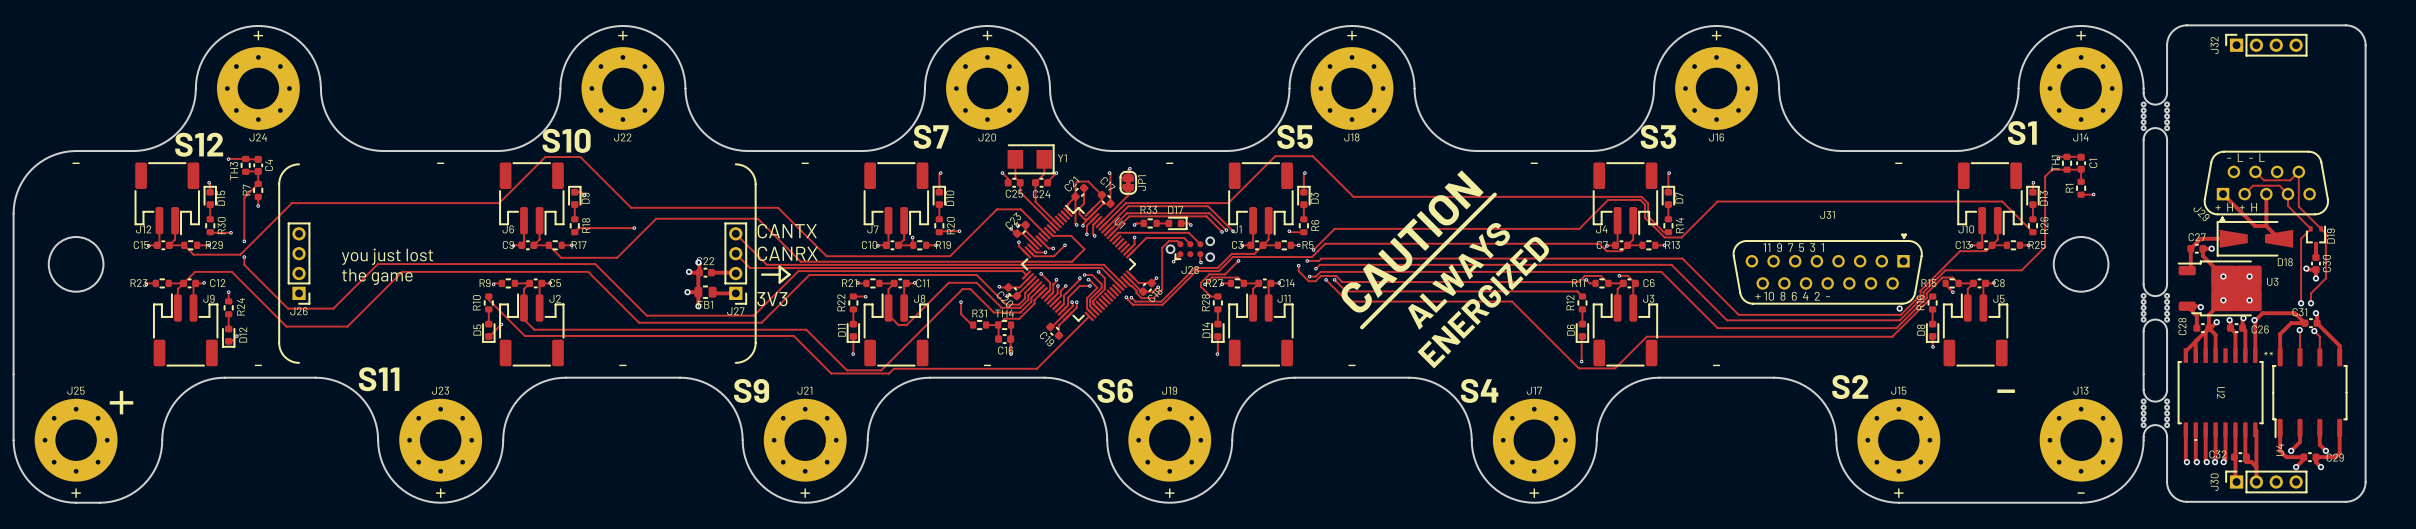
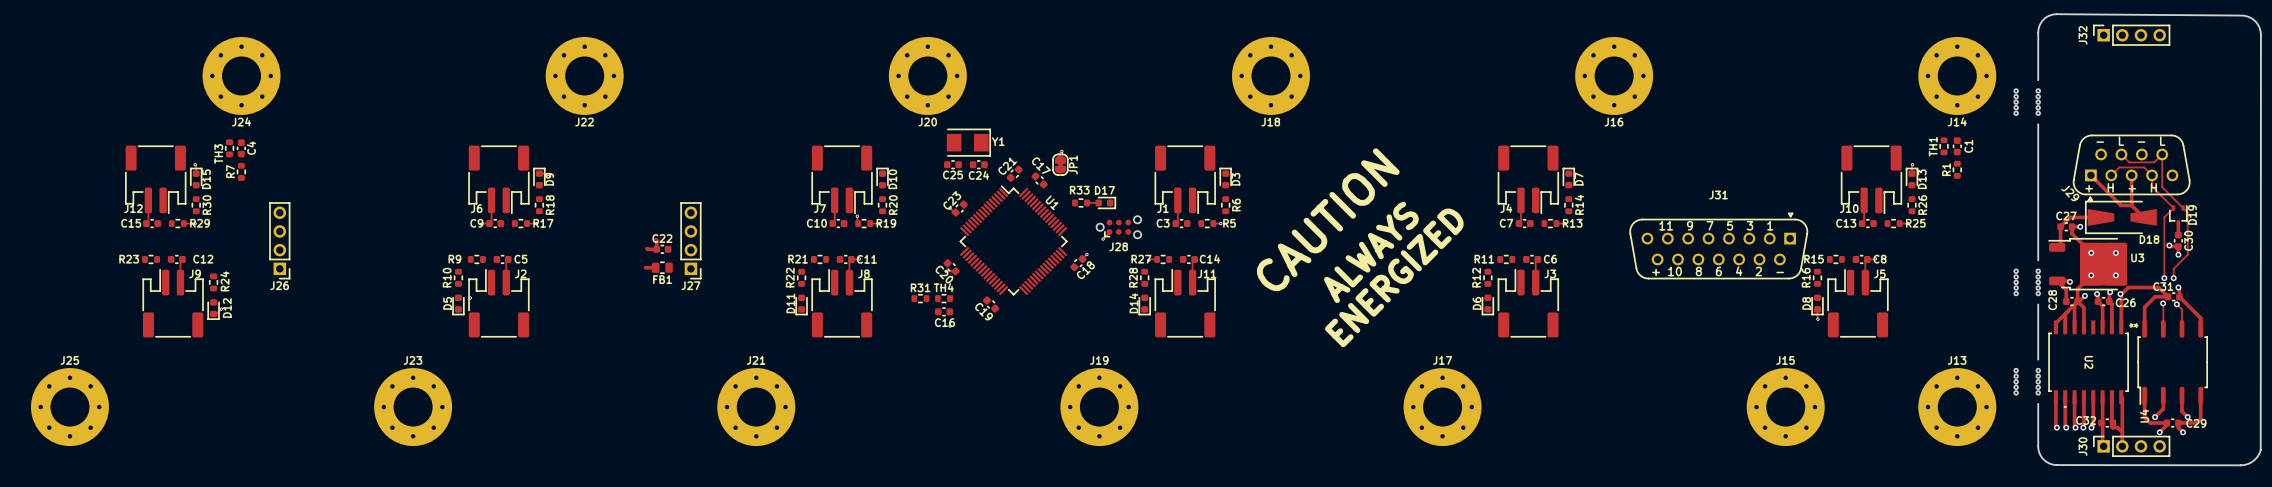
board edge: none -> (2240, 15) (2054, 14) (2042, 21) (2038, 35)
board edge: none -> (2241, 15) (2255, 21) (2260, 34) (2260, 450) (2253, 461) (2240, 465)
text: + (258, 35) -> none
text: + (622, 35) -> none
text: + (987, 35) -> none
text: + (1352, 35) -> none
text: + (1716, 35) -> none
text: + (2081, 35) -> none
board edge: (2167, 45) (2168, 37) (2172, 31) (2179, 26) (2186, 25) (2347, 25) (2359, 31) (2365, 45) (2364, 489) (2357, 497) (2348, 501) (2186, 501) -> (2240, 465) (2056, 465)
board edge: (2167, 92) (2165, 98) (2159, 103) (2153, 104) (2148, 102) (2144, 95) (2139, 65) (2130, 50) (2123, 42) (2108, 32) (2098, 28) (2081, 25) (2069, 27) (2048, 35) (2031, 50) (2020, 71) (2017, 99) (2012, 114) (2000, 132) (1982, 145) (1956, 151) (1830, 150) (1805, 139) (1790, 124) (1781, 104) (1774, 65) (1762, 46) (1749, 35) (1739, 30) (1722, 26) (1710, 26) (1688, 32) (1674, 42) (1666, 50) (1656, 71) (1653, 99) (1648, 114) (1639, 128) (1622, 142) (1596, 150) (1471, 150) (1445, 142) (1425, 124) (1416, 104) (1410, 65) (1401, 50) (1394, 42) (1384, 35) (1369, 28) (1346, 26) (1324, 32) (1309, 42) (1302, 50) (1291, 71) (1288, 99) (1283, 114) (1274, 128) (1258, 142) (1232, 150) (1107, 150) (1081, 142) (1061, 124) (1052, 104) (1045, 65) (1033, 46) (1015, 32) (998, 27) (987, 25) (975, 27) (959, 32) (945, 42) (937, 50) (927, 71) (923, 99) (919, 114) (910, 128) (893, 142) (867, 150) (747, 151) (726, 147) (703, 132) (689, 109) (683, 71) (672, 50) (665, 42) (650, 32) (640, 28) (622, 25) (605, 28) (595, 32) (580, 42) (573, 50) (562, 71) (559, 99) (554, 114) (545, 128) (529, 142) (503, 150) (383, 151) (367, 148) (352, 142) (332, 124) (323, 104) (316, 65) (308, 50) (300, 42) (286, 32) (275, 28) (258, 25) (246, 27) (225, 35) (208, 50) (198, 71) (194, 99) (190, 114) (181, 128) (169, 139) (154, 147) (138, 150) (76, 151) (59, 153) (35, 165) (21, 182) (15, 197) (13, 213) (13, 440) (15, 456) (21, 471) (31, 484) (44, 494) (70, 502) (110, 501) (135, 491) (150, 476) (160, 456) (163, 429) (168, 413) (180, 396) (193, 386) (219, 377) (326, 378) (351, 388) (366, 404) (376, 424) (382, 462) (394, 482) (407, 493) (418, 498) (429, 501) (446, 502) (468, 496) (482, 486) (490, 477) (500, 457) (504, 429) (509, 413) (521, 396) (534, 386) (560, 377) (685, 377) (711, 386) (731, 404) (740, 424) (746, 462) (752, 473) (763, 486) (777, 496) (788, 500) (810, 502) (833, 496) (847, 486) (855, 477) (865, 457) (868, 429) (873, 413) (886, 396) (898, 386) (924, 377) (1050, 377) (1075, 386) (1095, 404) (1105, 424) (1111, 462) (1123, 482) (1141, 496) (1152, 500) (1169, 502) (1181, 501) (1197, 496) (1207, 490) (1219, 477) (1229, 457) (1233, 429) (1238, 413) (1250, 396) (1263, 386) (1289, 377) (1409, 377) (1435, 383) (1453, 396) (1467, 418) (1474, 457) (1484, 477) (1492, 486) (1506, 496) (1517, 500) (1534, 502) (1551, 500) (1562, 496) (1576, 486) (1584, 477) (1594, 457) (1597, 429) (1602, 413) (1615, 396) (1628, 386) (1653, 377) (1773, 377) (1800, 383) (1821, 400) (1832, 418) (1838, 456) (1844, 471) (1858, 488) (1877, 498) (1898, 502) (2081, 502) (2107, 496) (2129, 480) (2139, 461) (2144, 433) (2148, 427) (2153, 425) (2159, 425) (2165, 430) (2167, 436) -> none
text: S1 (2022, 133) -> none
text: S7 (931, 136) -> none
text: S5 (1295, 136) -> none
text: S3 (1658, 136) -> none
board edge: (2167, 139) (2163, 131) (2155, 128) (2147, 131) (2143, 139) (2143, 285) (2148, 293) (2156, 296) (2163, 292) (2167, 284) -> none
text: S10 (566, 140) -> none
text: S12 (199, 144) -> none
track: (2080, 156) (2060, 156) (2058, 158) -> none
track: (245, 158) (228, 159) -> none
via: (2058, 158) -> none
via: (228, 159) -> none
track: (246, 159) (258, 159) -> none
track: (1015, 159) (1015, 177) (1020, 182) (1020, 192) (1054, 226) -> none
track: (1044, 159) (1044, 173) (1035, 182) (1035, 201) (1056, 223) -> none
text: - (76, 163) -> none
text: - (440, 163) -> none
text: - (805, 163) -> none
text: - (1169, 163) -> none
text: - (1534, 163) -> none
text: - (1898, 163) -> none
line: (299, 164) (286, 168) (281, 174) (279, 181) (279, 343) (284, 357) (299, 362) -> none
line: (735, 164) (743, 165) (749, 170) (755, 181) (755, 343) (749, 357) (735, 362) -> none
track: (2080, 169) (2051, 169) (2045, 176) (2045, 246) (2021, 270) (1945, 270) (1923, 292) (1923, 296) (1899, 320) (1727, 320) (1671, 264) (1319, 264) (1315, 268) -> none
track: (2081, 169) (2081, 181) -> none
track: (246, 171) (258, 171) (258, 183) (244, 197) (244, 241) -> none
track: (940, 173) (939, 192) -> none
via: (940, 173) -> none
track: (1002, 173) (1008, 178) (1008, 182) -> none
via: (1002, 173) -> none
track: (1056, 173) (1047, 181) -> none
via: (1056, 173) -> none
track: (1109, 173) (1110, 203) (1103, 203) (1082, 225) -> none
via: (1109, 173) -> none
track: (1304, 173) (1303, 192) -> none
via: (1304, 173) -> none
track: (1669, 173) (1668, 192) -> none
via: (1669, 173) -> none
track: (1128, 187) (1128, 195) (1100, 223) -> none
track: (1084, 188) (1084, 203) (1079, 208) (1079, 214) (1084, 219) (1087, 219) -> none
line: (1494, 194) (1362, 327) -> none
track: (2093, 194) (2081, 194) -> none
via: (2093, 194) -> none
track: (258, 196) (258, 206) -> none
track: (1075, 196) (1067, 204) (1067, 212) -> none
track: (210, 204) (210, 219) -> none
track: (574, 204) (574, 219) -> none
track: (939, 204) (939, 219) -> none
track: (1303, 204) (1303, 219) -> none
track: (1668, 204) (1668, 219) -> none
track: (2032, 204) (2032, 219) -> none
via: (258, 206) -> none
track: (1089, 212) (1101, 199) (1101, 195) (1088, 181) (1077, 181) (1075, 184) (1076, 225) -> none
track: (1094, 217) (1086, 225) (1086, 234) -> none
track: (175, 220) (175, 239) (169, 245) (184, 245) (193, 254) (240, 254) (292, 203) (499, 203) (545, 156) (580, 156) (631, 207) (778, 207) (826, 256) (950, 256) (997, 209) (1020, 209) (1045, 234) -> none
track: (539, 220) (539, 239) (533, 245) (548, 245) (561, 257) (617, 257) (656, 218) (757, 218) (800, 261) (1072, 261) (1084, 249) (1071, 235) (1052, 235) (1048, 231) -> none
track: (904, 220) (904, 239) (898, 245) (913, 245) -> none
track: (1097, 220) (1093, 224) (1094, 235) -> none
track: (1268, 220) (1268, 239) (1254, 253) (1231, 253) (1217, 267) (1195, 267) (1161, 301) (1135, 301) (1131, 297) -> none
track: (1633, 220) (1633, 239) (1621, 251) (1606, 251) (1599, 243) (1325, 243) (1312, 257) (1233, 257) (1218, 271) (1196, 271) (1162, 304) (1132, 304) (1126, 297) -> none
track: (1997, 220) (1997, 239) (1986, 251) (1960, 251) (1920, 290) (1920, 295) (1900, 314) (1738, 314) (1682, 258) (1321, 258) (1319, 260) (1307, 260) -> none
track: (1143, 223) (1134, 225) -> none
track: (1181, 223) (1190, 225) -> none
track: (1017, 225) (1025, 225) (1025, 230) (1037, 242) -> none
via: (1017, 225) -> none
via: (1076, 225) -> none
via: (1082, 225) -> none
via: (1134, 225) -> none
via: (1190, 225) -> none
track: (1103, 226) (1126, 203) (1228, 203) (1275, 156) (1312, 156) (1353, 196) (1641, 196) (1648, 203) (1648, 216) (1663, 232) (1668, 232) -> none
track: (634, 228) (578, 228) (574, 232) -> none
via: (634, 228) -> none
track: (1105, 228) (1128, 206) (1208, 206) (1233, 231) -> none
track: (1226, 230) (1209, 213) (1126, 213) (1108, 231) -> none
via: (1226, 230) -> none
text: CANTX (787, 231) -> none
track: (940, 231) (959, 231) -> none
via: (959, 231) -> none
track: (1222, 231) (1206, 216) (1129, 216) (1111, 234) -> none
via: (1222, 231) -> none
via: (1233, 231) -> none
track: (1289, 231) (1303, 232) -> none
via: (1289, 231) -> none
track: (210, 232) (231, 232) -> none
via: (231, 232) -> none
track: (2032, 232) (2002, 201) (1717, 201) (1681, 237) (1664, 237) (1644, 217) (1644, 204) (1640, 199) (1608, 199) (1579, 228) (1334, 228) (1313, 249) -> none
track: (735, 233) (766, 264) (1103, 264) (1122, 283) -> none
track: (1017, 233) (1022, 233) (1034, 245) -> none
via: (1086, 234) -> none
via: (1094, 235) -> none
round board edge: [47, 236, 105, 293] -> none
round board edge: [2052, 236, 2110, 293] -> none
track: (1114, 237) (1118, 232) (1188, 232) (1200, 244) -> none
track: (1134, 237) (1134, 244) (1127, 250) -> none
via: (1134, 237) -> none
track: (1040, 239) (1048, 248) (1053, 248) -> none
via: (244, 241) -> none
track: (1018, 242) (1018, 246) (1026, 253) -> none
via: (1018, 242) -> none
track: (1180, 244) (1177, 241) (1168, 241) (1162, 247) (1162, 289) (1153, 298) (1141, 298) (1125, 280) -> none
track: (1190, 244) (1184, 238) (1146, 238) (1130, 253) -> none
via: (148, 245) -> none
track: (157, 245) (148, 245) -> none
via: (877, 245) -> none
track: (886, 245) (877, 245) -> none
track: (1065, 245) (1054, 256) (1034, 256) (1029, 250) -> none
via: (1065, 245) -> none
via: (1242, 245) -> none
track: (1250, 245) (1242, 245) -> none
track: (1263, 245) (1277, 245) -> none
via: (1606, 245) -> none
track: (1615, 245) (1606, 245) -> none
track: (1627, 245) (1642, 245) -> none
via: (1971, 245) -> none
track: (1979, 245) (1971, 245) -> none
track: (1992, 245) (2006, 245) -> none
track: (1032, 248) (1036, 252) (1045, 252) -> none
via: (1053, 248) -> none
via: (1313, 249) -> none
via: (1045, 252) -> none
track: (735, 253) (750, 267) (1101, 267) (1119, 286) -> none
text: CANRX (787, 253) -> none
track: (1200, 254) (1201, 262) -> none
text: you just lost (387, 256) -> none
track: (244, 257) (244, 264) (288, 308) (333, 308) (377, 264) (595, 264) (646, 315) (753, 315) (798, 271) (1022, 271) (1026, 274) -> none
via: (244, 257) -> none
track: (1238, 260) (1225, 274) (1209, 274) (1201, 282) (1201, 286) (1210, 296) (1217, 296) -> none
via: (1238, 260) -> none
via: (1307, 260) -> none
via: (698, 262) -> none
via: (1201, 262) -> none
track: (1298, 265) (1298, 271) (1308, 281) (1315, 281) (1320, 275) (1336, 275) (1342, 282) (1578, 282) (1584, 275) (1601, 275) (1608, 283) (1623, 283) (1617, 289) (1617, 308) -> none
via: (1298, 265) -> none
line: (779, 266) (779, 282) (789, 274) (779, 266) -> none
via: (1315, 268) -> none
via: (689, 271) -> none
track: (1098, 271) (1104, 278) (1104, 289) (1093, 300) (1093, 303) (1097, 308) -> none
via: (1098, 271) -> none
track: (711, 272) (734, 272) -> none
track: (698, 273) (698, 306) -> none
track: (1041, 273) (1050, 282) (1050, 290) (1045, 294) -> none
via: (1041, 273) -> none
line: (762, 274) (779, 274) -> none
track: (1130, 274) (1138, 283) (1151, 283) -> none
track: (1084, 275) (1092, 275) (1101, 284) (1101, 287) (1090, 299) (1090, 306) (1094, 310) -> none
via: (1084, 275) -> none
track: (1619, 275) (1627, 275) (1635, 283) -> none
via: (1619, 275) -> none
text: the game (377, 276) -> none
track: (1309, 276) (1315, 276) (1320, 271) (1661, 271) (1717, 328) (1896, 328) (1926, 297) (1926, 293) (1942, 277) (1952, 277) (1958, 283) (1973, 283) (1967, 289) (1967, 308) -> none
via: (1309, 276) -> none
track: (1029, 277) (1019, 287) (999, 286) -> none
track: (1127, 277) (1141, 291) -> none
track: (1079, 278) (1063, 295) (1063, 303) (1059, 308) -> none
via: (1079, 278) -> none
track: (1056, 279) (1053, 284) (1053, 292) (1048, 297) -> none
via: (1056, 279) -> none
track: (1088, 279) (1097, 287) (1087, 298) (1087, 308) (1092, 313) -> none
via: (1088, 279) -> none
track: (1326, 279) (1347, 301) (1512, 301) (1578, 368) (1615, 368) (1646, 336) (1892, 336) (1932, 296) -> none
via: (1326, 279) -> none
track: (1334, 279) (1346, 291) (1577, 291) (1582, 296) -> none
via: (1334, 279) -> none
track: (1586, 279) (1589, 283) (1595, 283) -> none
via: (1586, 279) -> none
track: (1032, 280) (1016, 295) -> none
track: (204, 282) (195, 283) -> none
via: (204, 282) -> none
track: (550, 282) (541, 283) -> none
via: (550, 282) -> none
track: (857, 282) (866, 283) -> none
via: (857, 282) -> none
track: (1279, 282) (1270, 283) -> none
via: (1279, 282) -> none
track: (155, 283) (146, 284) -> none
track: (168, 283) (183, 283) -> none
track: (501, 283) (493, 284) -> none
track: (514, 283) (529, 283) (523, 289) (523, 308) -> none
track: (879, 283) (894, 283) (888, 289) (888, 308) -> none
track: (1034, 283) (1025, 292) (1025, 298) (1018, 304) (1006, 304) (976, 275) (809, 275) (761, 322) (639, 322) (588, 271) (402, 271) (347, 326) (286, 326) (231, 271) (195, 271) (177, 289) (177, 308) -> none
via: (146, 284) -> none
via: (493, 284) -> none
track: (1204, 284) (1211, 277) (1238, 277) (1243, 283) (1258, 283) (1253, 289) (1253, 308) -> none
via: (1204, 284) -> none
track: (1945, 284) (1952, 292) -> none
track: (1057, 285) (1057, 293) (1051, 299) -> none
via: (1057, 285) -> none
track: (1065, 285) (1060, 290) (1060, 295) (1054, 302) -> none
via: (1065, 285) -> none
track: (1089, 285) (1079, 285) (1068, 297) (1068, 305) (1062, 310) -> none
via: (1089, 285) -> none
via: (999, 286) -> none
track: (1037, 286) (1020, 307) (1001, 307) (976, 282) (948, 282) (906, 325) (898, 325) (888, 315) -> none
track: (1158, 287) (1153, 291) (1143, 291) -> none
via: (1158, 287) -> none
track: (1040, 288) (1020, 312) (993, 312) (970, 289) (962, 289) (881, 370) (846, 370) (806, 329) (534, 329) (523, 319) -> none
track: (1043, 291) (1019, 318) (1004, 318) (998, 325) (986, 325) -> none
track: (228, 292) (228, 301) -> none
via: (228, 292) -> none
via: (687, 292) -> none
via: (1952, 292) -> none
track: (713, 293) (735, 293) -> none
track: (488, 296) (488, 299) (524, 335) (793, 335) (831, 373) (889, 373) (893, 368) (1036, 368) (1089, 316) -> none
track: (853, 296) (865, 296) -> none
via: (865, 296) -> none
via: (1126, 297) -> none
via: (1131, 297) -> none
text: 3V3 (772, 299) -> none
track: (961, 302) (961, 314) (971, 325) -> none
via: (961, 302) -> none
track: (1072, 302) (1072, 306) (1051, 326) -> none
via: (1072, 302) -> none
track: (1076, 302) (1076, 307) (1058, 325) (1058, 335) -> none
via: (1076, 302) -> none
via: (698, 306) -> none
via: (1899, 308) -> none
track: (488, 309) (488, 324) -> none
track: (853, 309) (853, 324) -> none
track: (1217, 309) (1217, 324) -> none
track: (1582, 309) (1582, 324) -> none
track: (1932, 309) (1932, 324) -> none
track: (228, 314) (228, 329) -> none
track: (501, 324) (489, 336) -> none
track: (998, 325) (998, 339) -> none
track: (1011, 325) (1011, 338) -> none
board edge: (2167, 331) (2163, 322) (2155, 319) (2147, 322) (2143, 331) (2144, 394) (2149, 400) (2156, 401) (2163, 398) (2167, 389) -> none
track: (853, 336) (853, 354) -> none
track: (1217, 336) (1217, 354) -> none
track: (1581, 337) (1581, 361) -> none
track: (1010, 339) (1011, 354) -> none
via: (853, 354) -> none
via: (1217, 354) -> none
via: (1581, 361) -> none
text: - (258, 365) -> none
text: - (622, 365) -> none
text: - (987, 365) -> none
text: - (1352, 365) -> none
text: - (1716, 365) -> none
text: S11 (379, 379) -> none
text: S2 (1850, 387) -> none
text: S9 (751, 390) -> none
text: S6 (1115, 390) -> none
text: S4 (1479, 390) -> none
text: - (2006, 391) -> none
text: + (121, 402) -> none
text: + (76, 493) -> none
text: + (440, 493) -> none
text: + (805, 493) -> none
text: + (1169, 493) -> none
text: + (1534, 493) -> none
text: + (1898, 493) -> none
text: - (2081, 493) -> none

